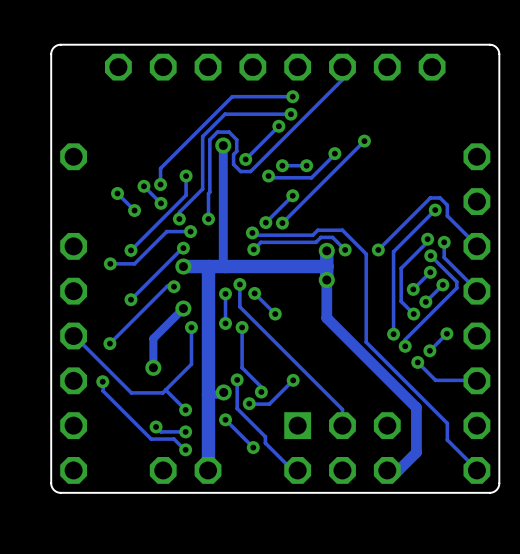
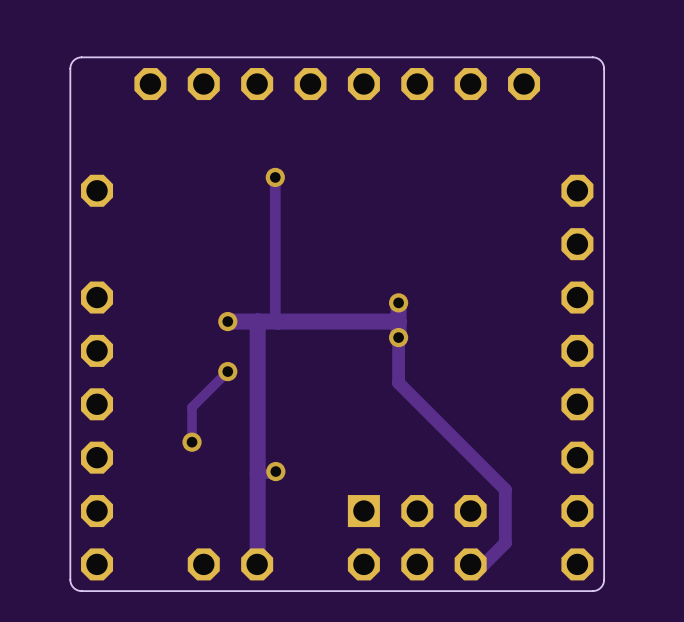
track: (342, 67) (342, 79) (250, 171) (240, 171) (233, 164) (236, 139) (229, 132) (217, 132) (209, 139) (208, 219) -> none
track: (292, 96) (232, 96) (160, 168) (160, 184) -> none
via: (292, 96) -> none
track: (290, 114) (225, 114) (202, 136) (202, 189) (179, 212) (179, 219) -> none
via: (290, 114) -> none
track: (278, 126) (245, 159) -> none
via: (278, 126) -> none
track: (364, 141) (282, 223) -> none
via: (364, 141) -> none
track: (334, 153) (311, 177) (270, 177) (268, 176) -> none
via: (334, 153) -> none
via: (245, 159) -> none
via: (282, 165) -> none
track: (306, 165) (282, 165) -> none
via: (306, 165) -> none
track: (186, 176) (186, 195) (130, 250) -> none
via: (186, 176) -> none
via: (268, 176) -> none
via: (160, 184) -> none
track: (143, 186) (160, 203) -> none
via: (143, 186) -> none
track: (117, 193) (134, 210) -> none
via: (117, 193) -> none
track: (292, 195) (265, 222) -> none
via: (292, 195) -> none
via: (160, 203) -> none
via: (134, 210) -> none
track: (435, 210) (393, 251) (393, 334) -> none
via: (435, 210) -> none
via: (179, 219) -> none
via: (208, 219) -> none
via: (265, 222) -> none
via: (282, 223) -> none
track: (190, 231) (166, 231) (134, 263) (110, 263) -> none
via: (190, 231) -> none
track: (252, 232) (254, 235) (312, 235) (317, 230) (342, 230) (366, 253) (366, 342) (447, 423) (447, 439) (476, 470) -> none
via: (252, 232) -> none
track: (427, 239) (427, 241) (401, 268) (401, 301) (413, 314) -> none
via: (427, 239) -> none
track: (444, 242) (444, 257) (476, 291) -> none
via: (444, 242) -> none
track: (476, 246) (447, 215) (447, 205) (440, 197) (430, 197) (378, 249) -> none
track: (183, 248) (130, 299) -> none
via: (183, 248) -> none
track: (253, 249) (260, 242) (316, 242) (320, 237) (332, 237) (345, 249) -> none
via: (253, 249) -> none
via: (345, 249) -> none
via: (378, 249) -> none
via: (130, 250) -> none
track: (430, 255) (456, 281) (456, 288) (405, 339) (405, 346) -> none
via: (430, 255) -> none
via: (110, 263) -> none
track: (430, 272) (413, 289) -> none
via: (430, 272) -> none
track: (239, 284) (239, 306) (342, 409) (342, 425) -> none
via: (239, 284) -> none
track: (442, 284) (425, 301) -> none
via: (442, 284) -> none
track: (173, 286) (167, 286) (109, 343) -> none
via: (173, 286) -> none
via: (413, 289) -> none
track: (225, 293) (225, 323) -> none
via: (225, 293) -> none
track: (254, 293) (275, 314) -> none
via: (254, 293) -> none
via: (130, 299) -> none
via: (425, 301) -> none
via: (275, 314) -> none
via: (413, 314) -> none
via: (225, 323) -> none
track: (191, 327) (191, 364) (162, 392) (131, 392) (73, 336) -> none
via: (191, 327) -> none
track: (242, 327) (242, 367) (261, 387) (261, 392) -> none
via: (242, 327) -> none
track: (446, 333) (429, 350) -> none
via: (446, 333) -> none
via: (393, 334) -> none
via: (109, 343) -> none
via: (405, 346) -> none
via: (429, 350) -> none
track: (417, 362) (435, 380) (476, 380) -> none
via: (417, 362) -> none
track: (237, 379) (237, 408) (265, 436) (265, 443) (292, 470) (297, 470) -> none
via: (237, 379) -> none
track: (293, 380) (269, 404) (249, 403) -> none
via: (293, 380) -> none
track: (102, 381) (103, 391) (151, 439) (173, 439) (185, 449) -> none
via: (102, 381) -> none
track: (165, 389) (185, 409) -> none
via: (261, 392) -> none
via: (249, 403) -> none
via: (185, 409) -> none
track: (225, 419) (253, 447) -> none
via: (225, 419) -> none
track: (156, 426) (160, 431) (185, 431) -> none
via: (156, 426) -> none
via: (185, 431) -> none
via: (253, 447) -> none
via: (185, 449) -> none

